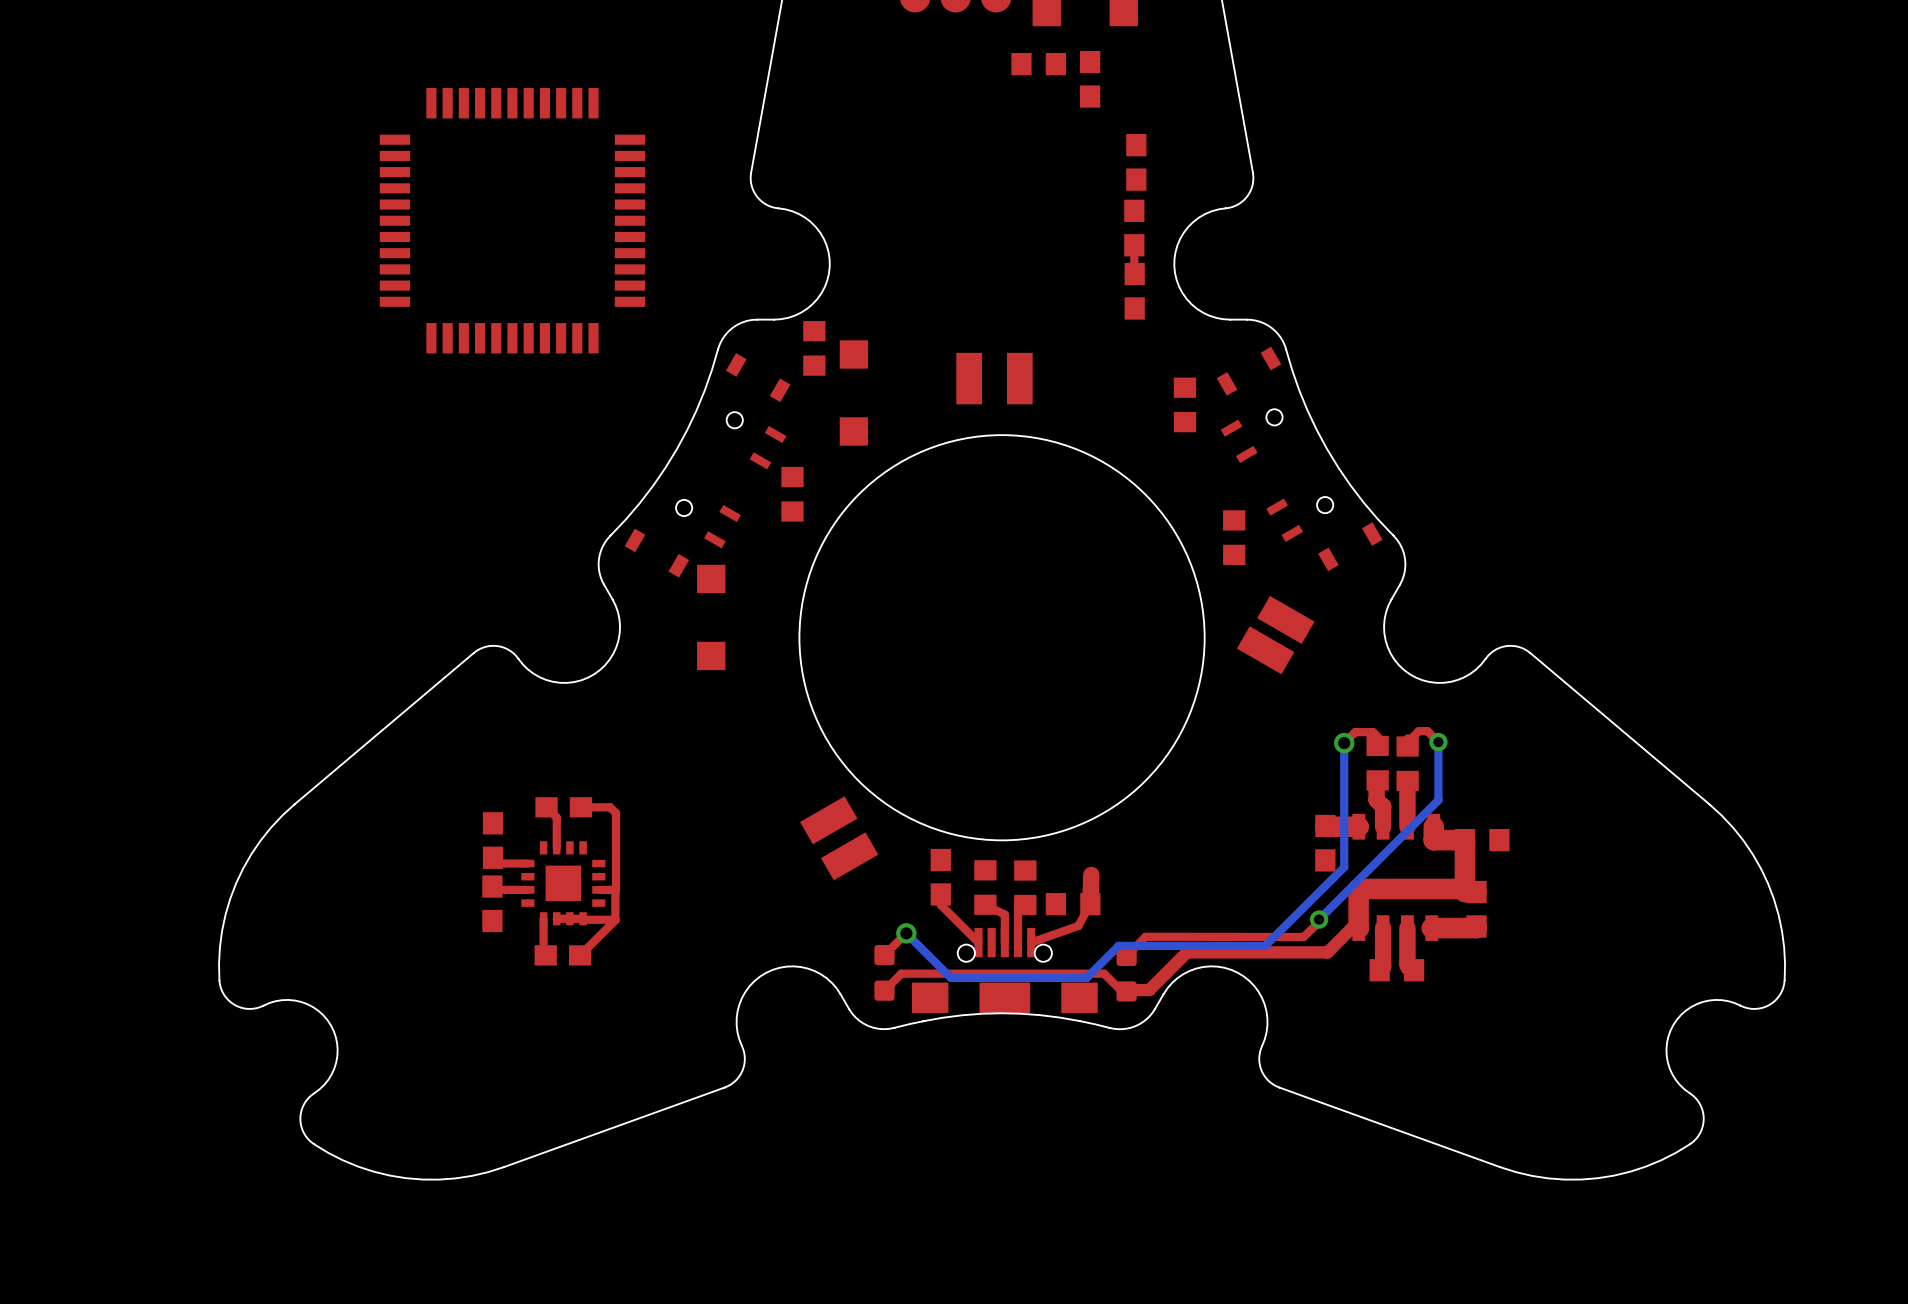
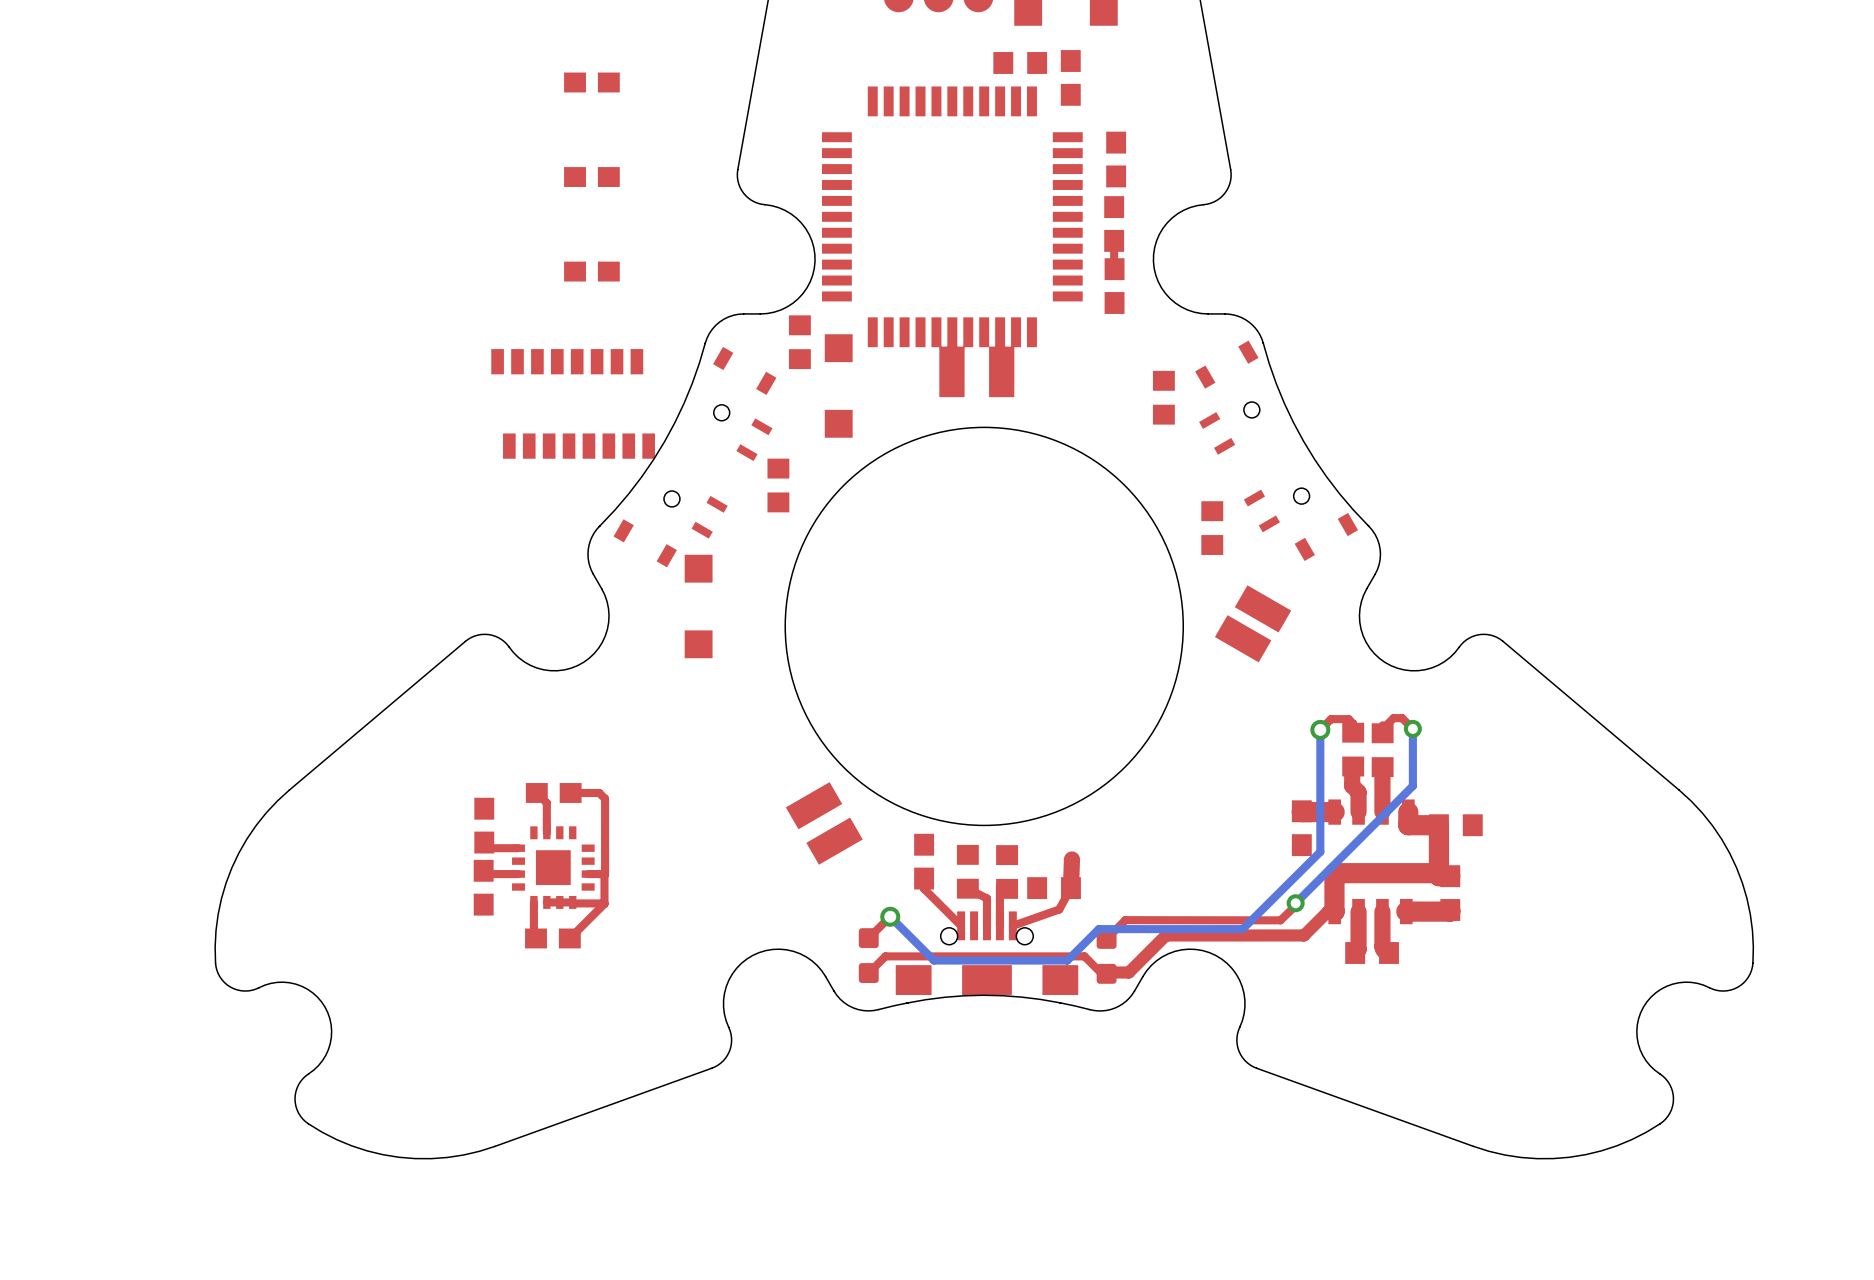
part: none -> (591, 82)
part: none -> (591, 177)
part position: (512, 220) -> (952, 216)
part: none -> (591, 271)
part: none -> (567, 361)
part: none -> (579, 446)

